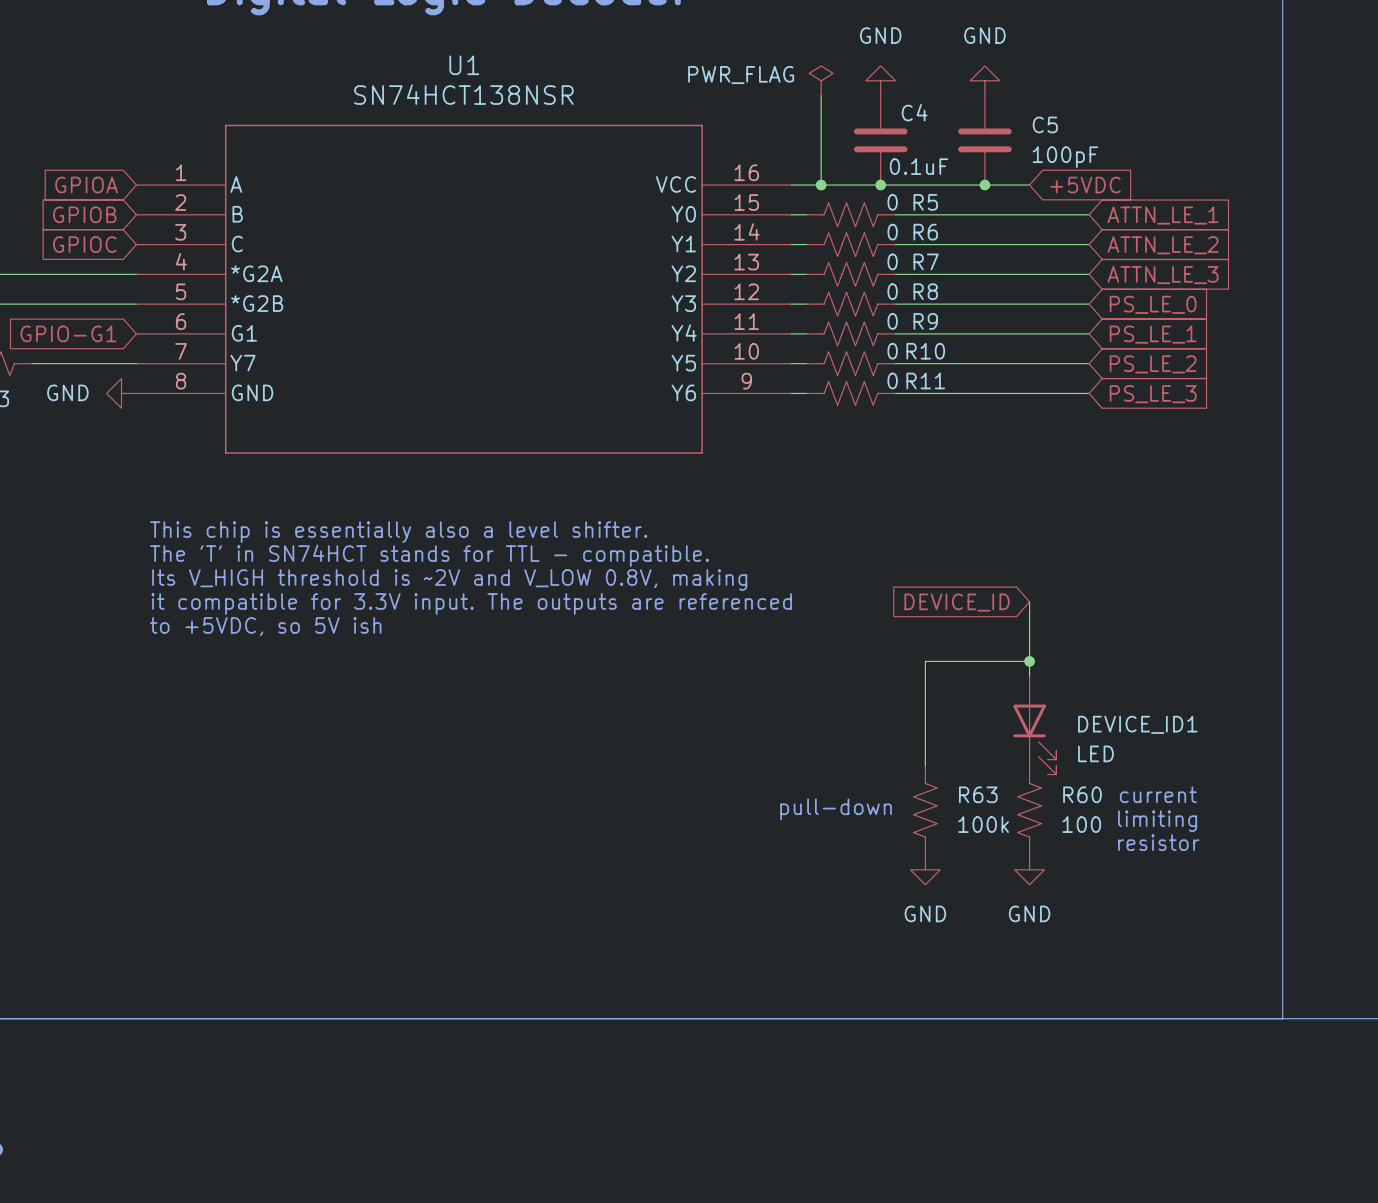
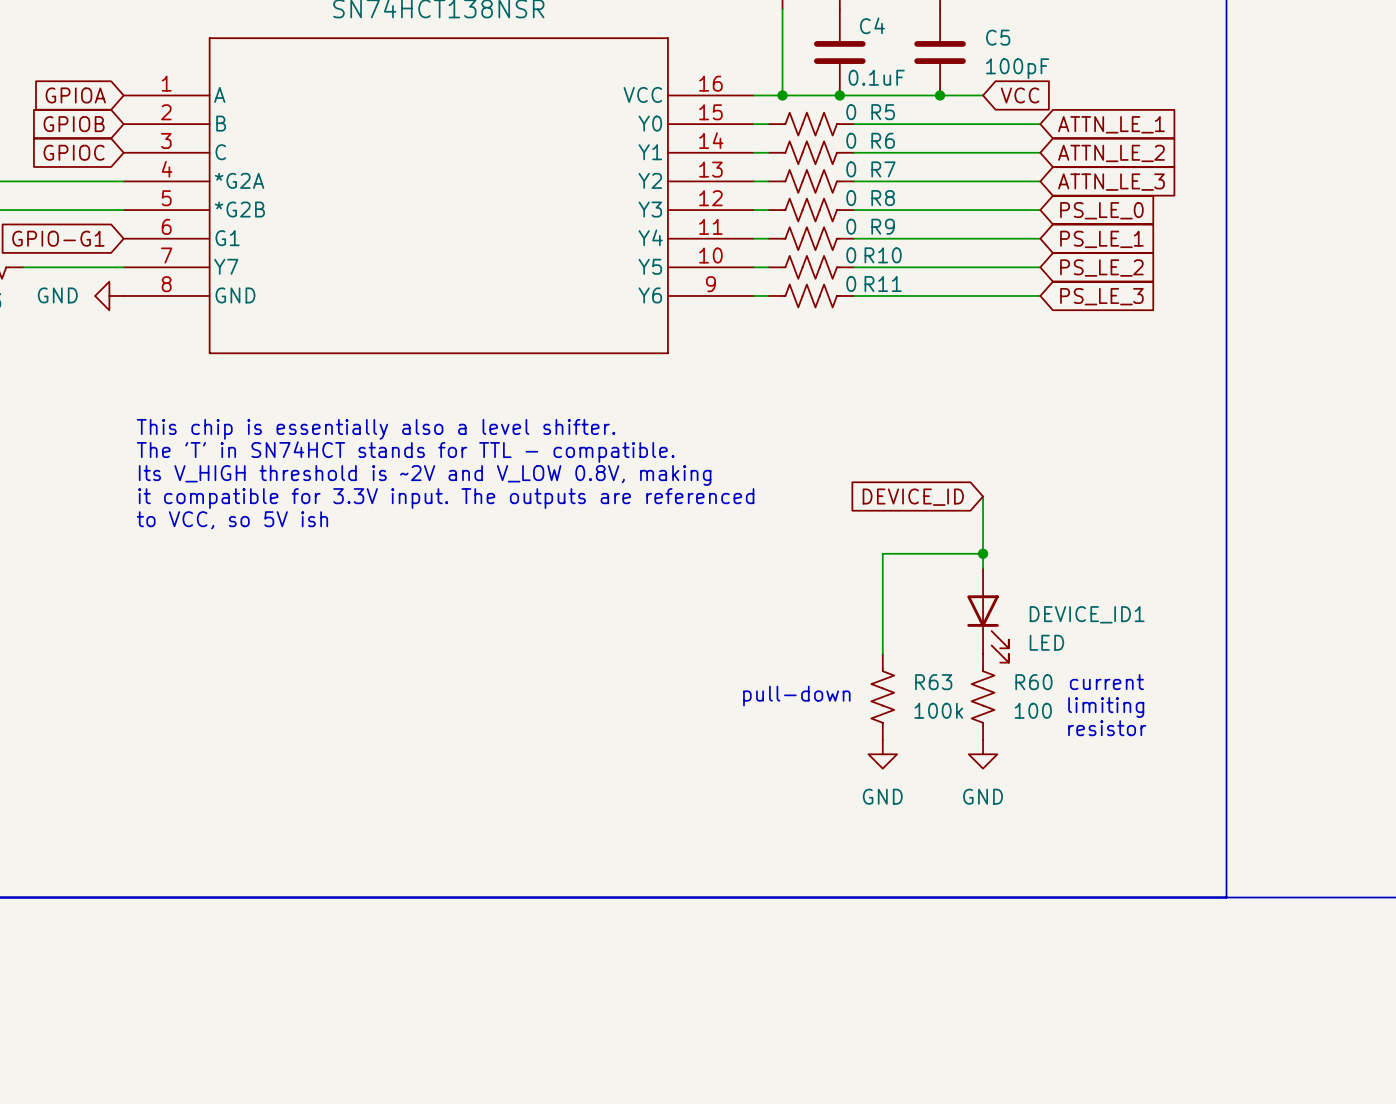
global label: +5VDC (1085, 185) -> VCC (1020, 95)
text: to +5VDC, so 5V ish (265, 626) -> to VCC, so 5V ish (232, 520)

